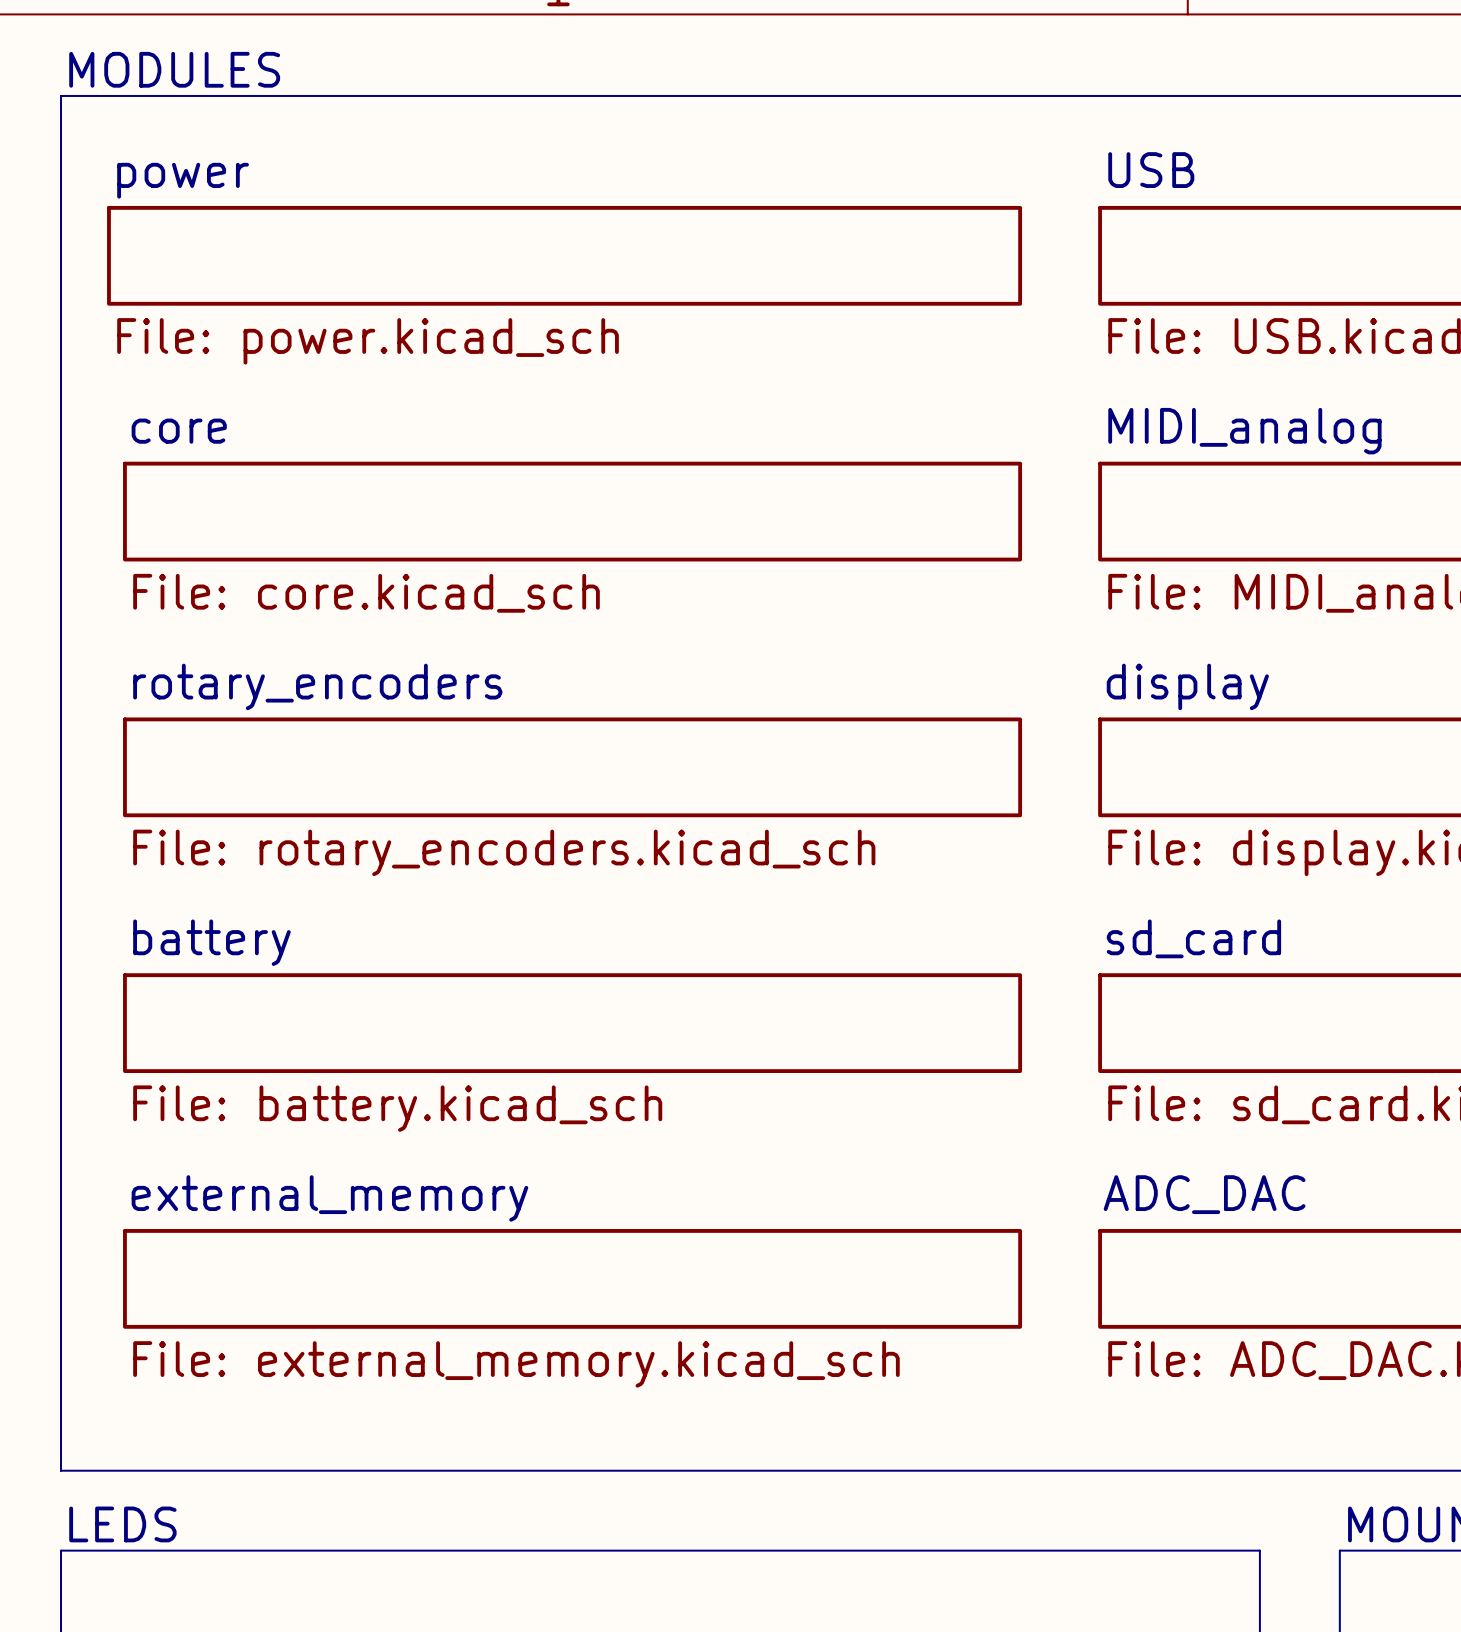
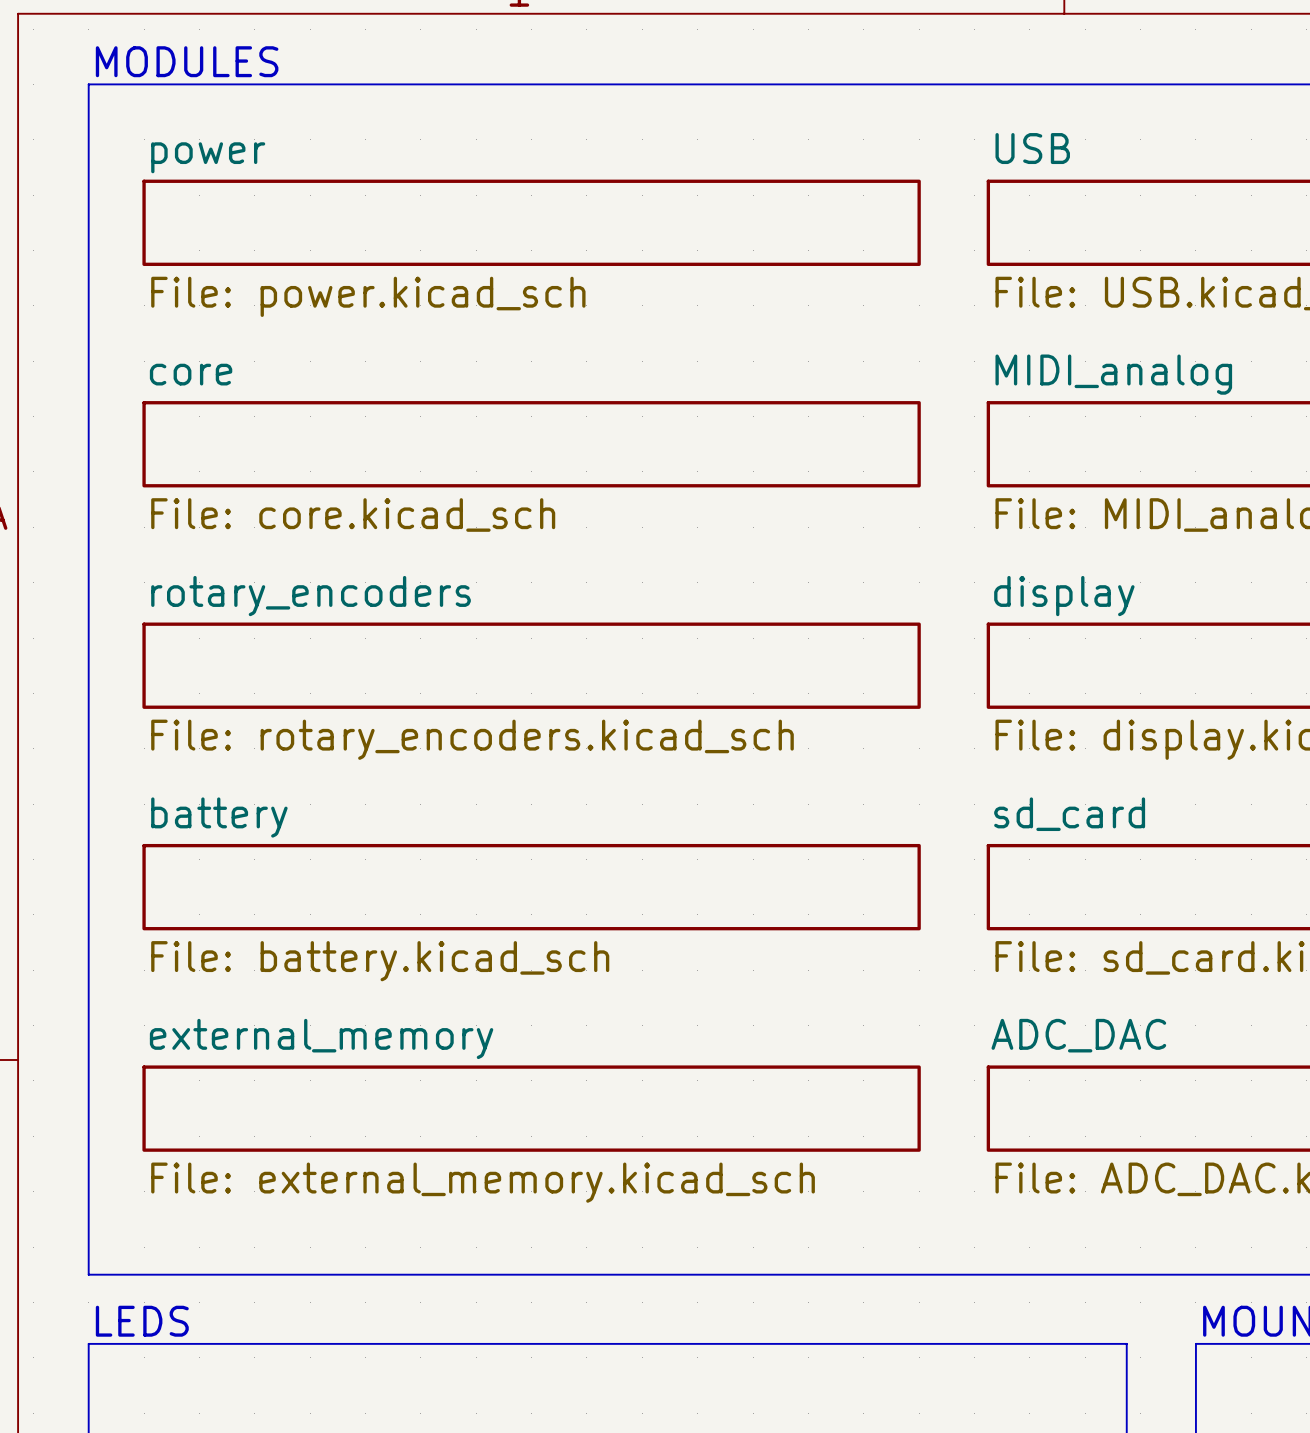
sheet power name position: power (183, 180) -> power (208, 157)
sheet power shape: [107, 205, 1023, 306] -> [142, 179, 921, 266]
sheet power value position: File: power.kicad_sch (368, 341) -> File: power.kicad_sch (368, 296)

